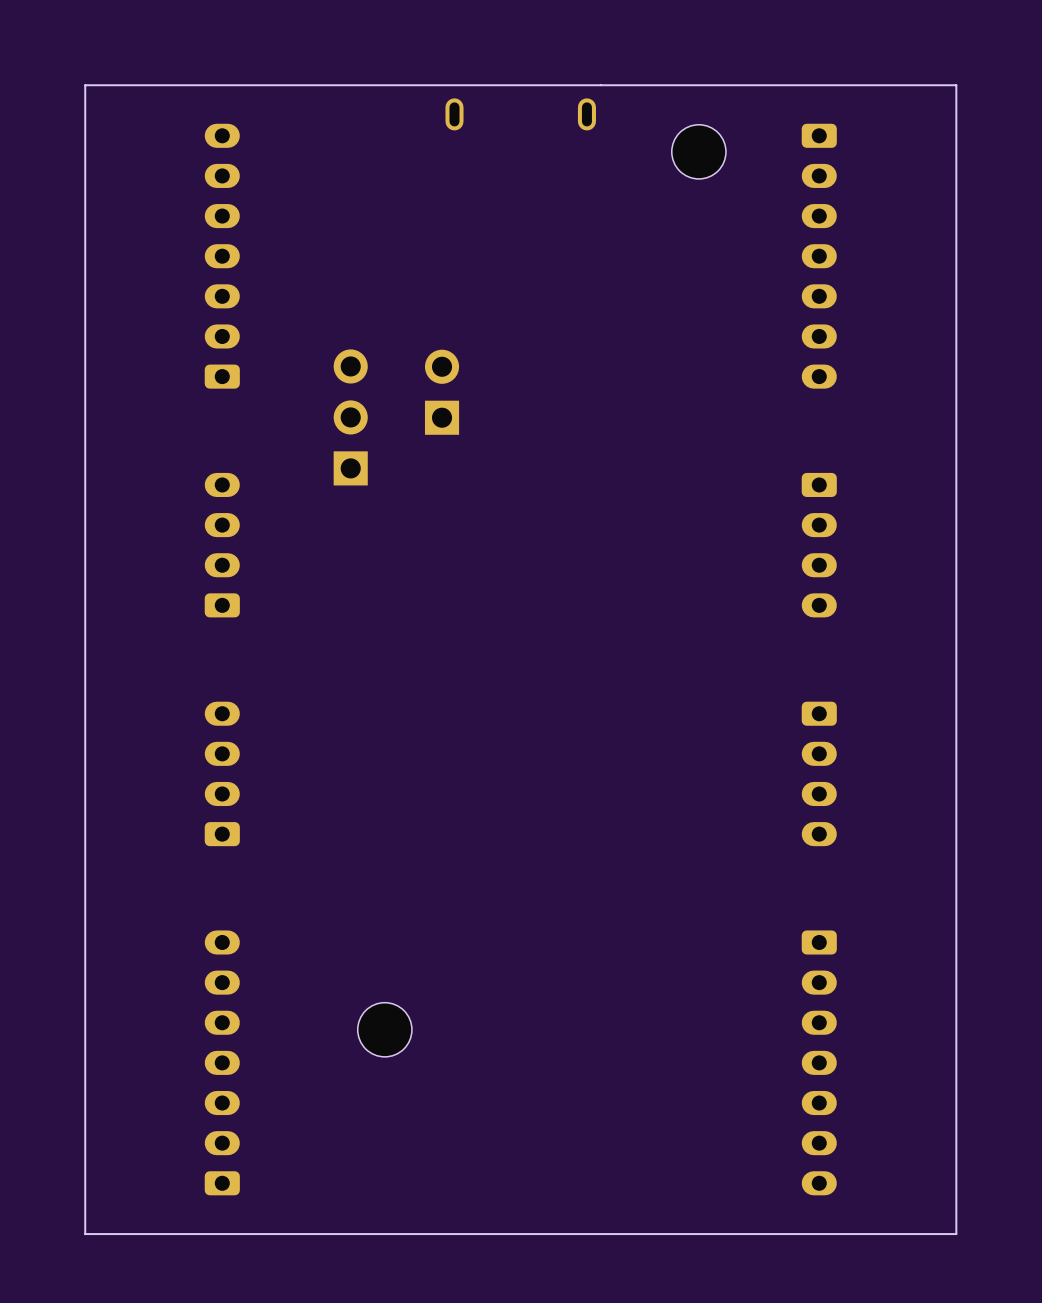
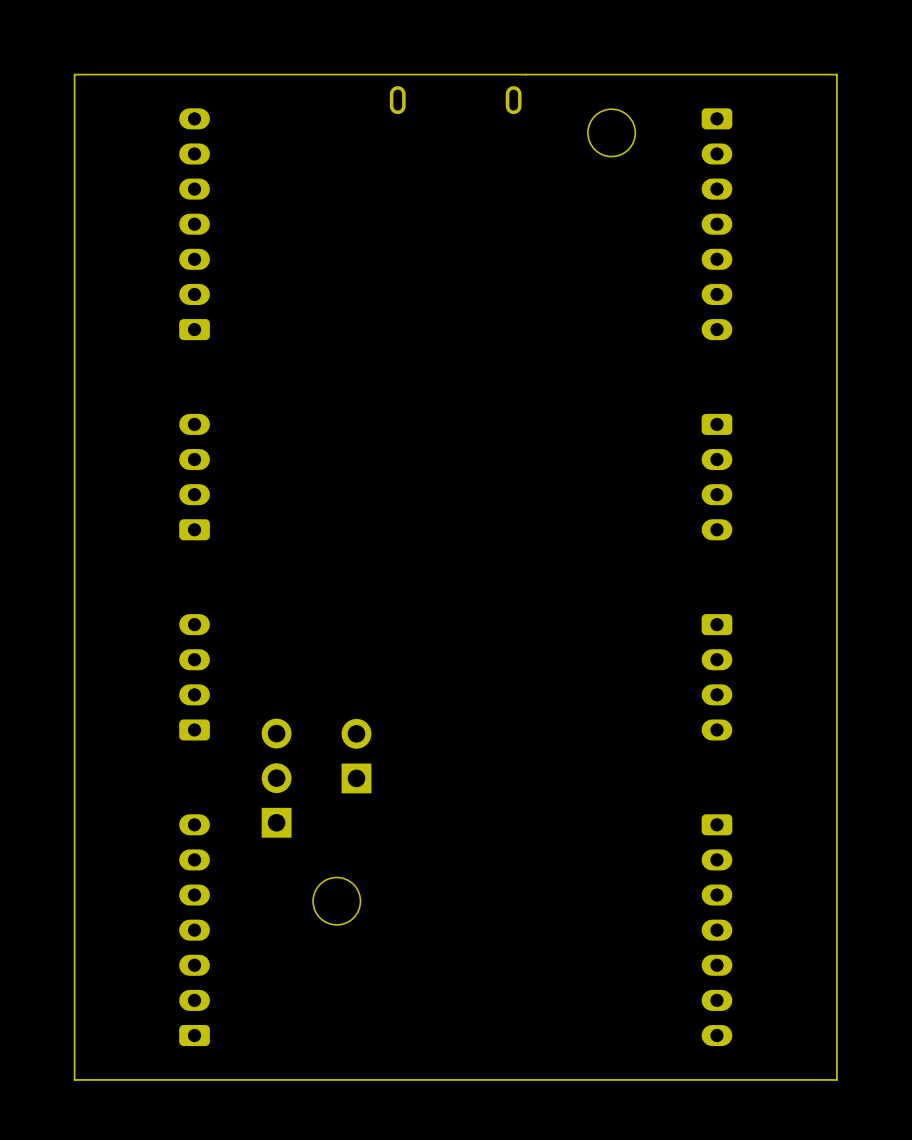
part position: (442, 392) -> (356, 756)
part position: (350, 417) -> (276, 778)

